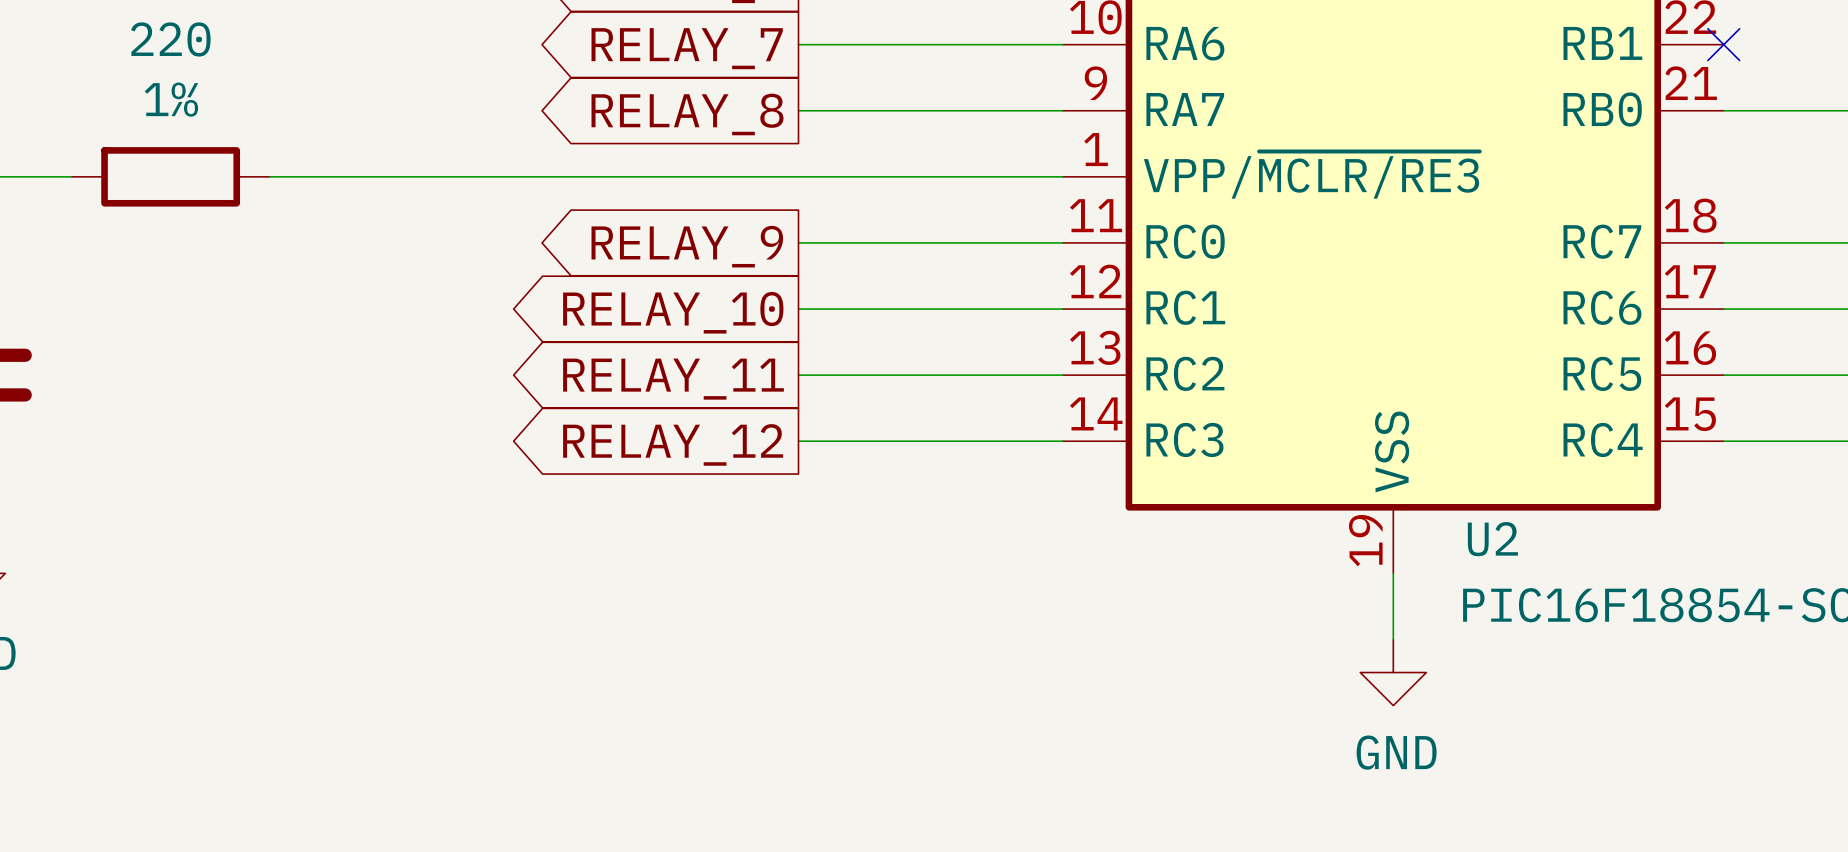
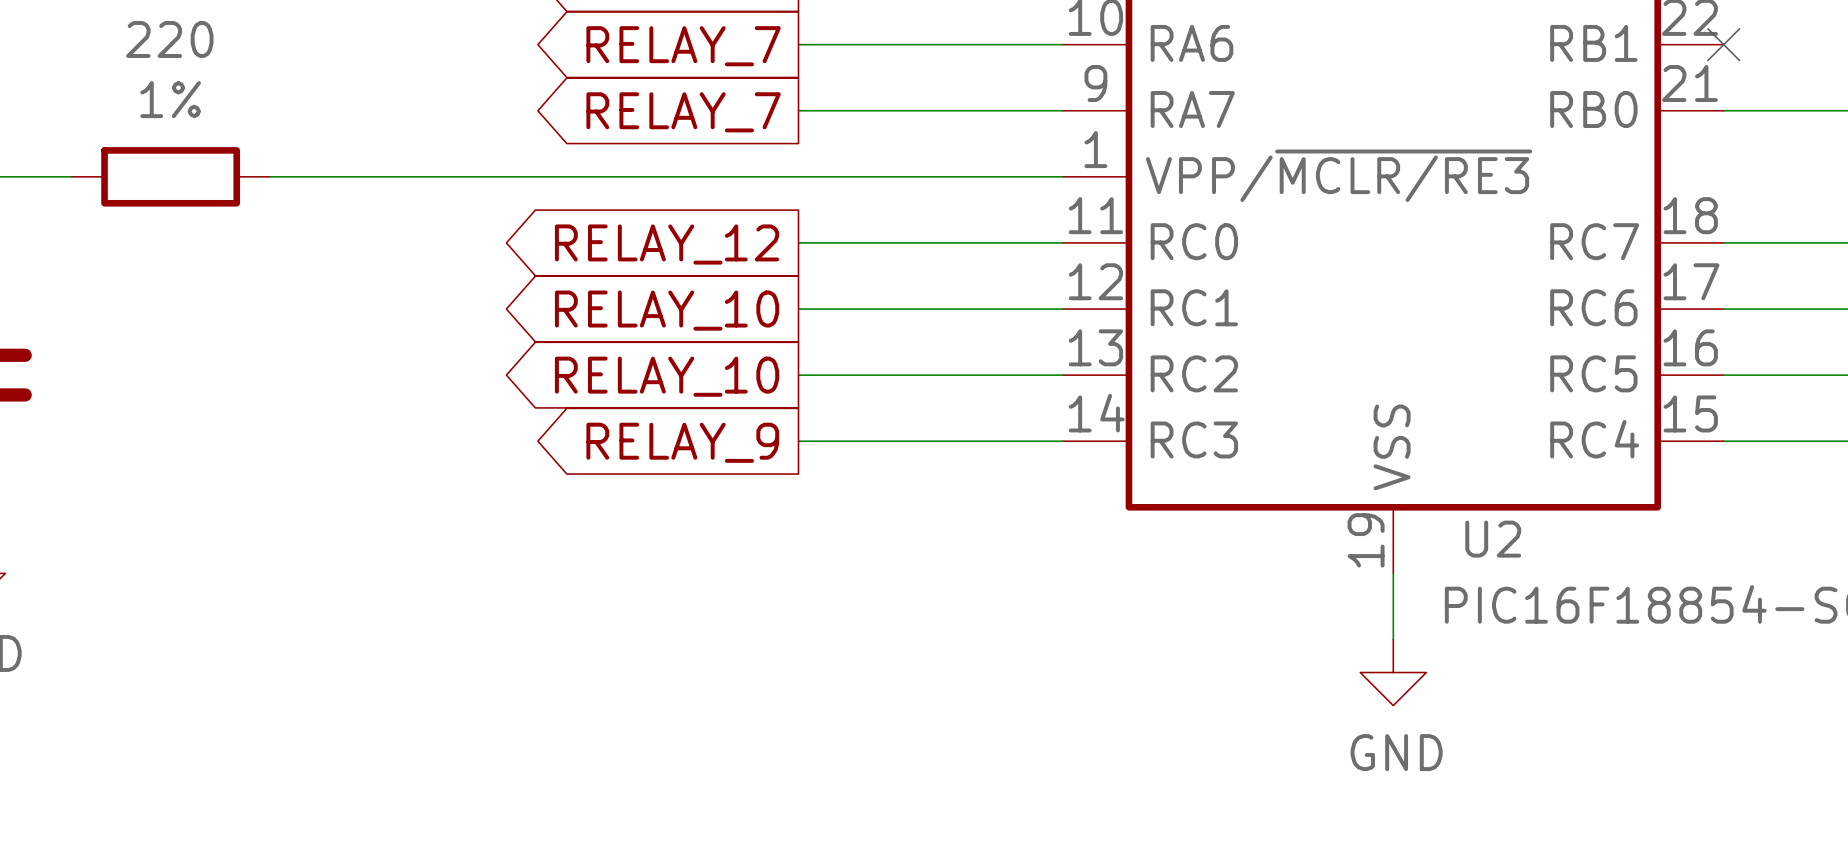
global label: RELAY_8 (687, 114) -> RELAY_7 (683, 112)
global label: RELAY_9 (687, 246) -> RELAY_12 (667, 244)
global label: RELAY_11 (673, 379) -> RELAY_10 (667, 376)
global label: RELAY_12 (673, 444) -> RELAY_9 (682, 442)

